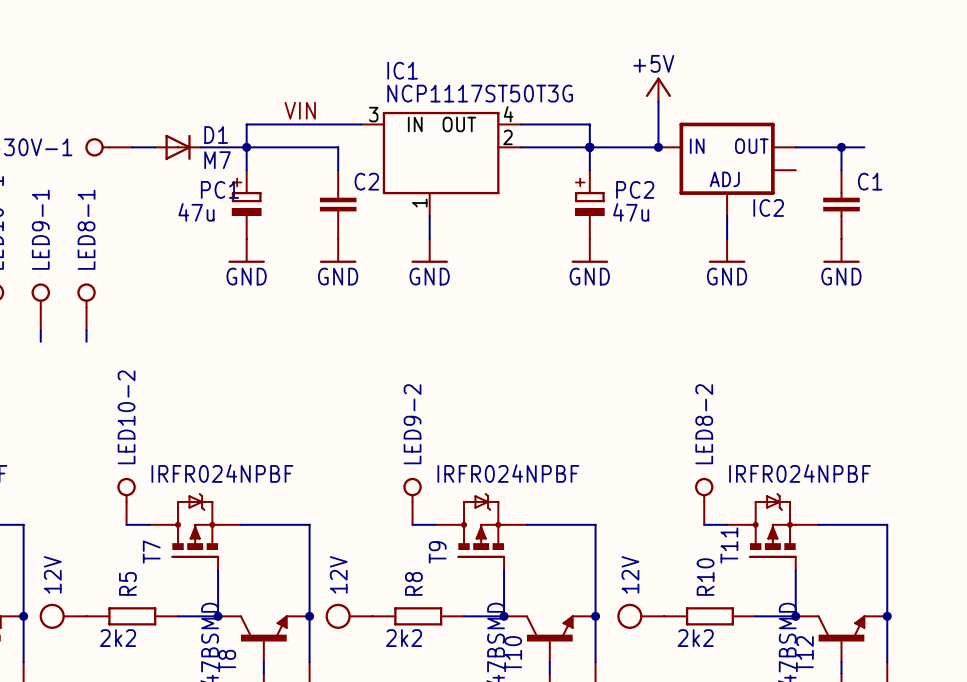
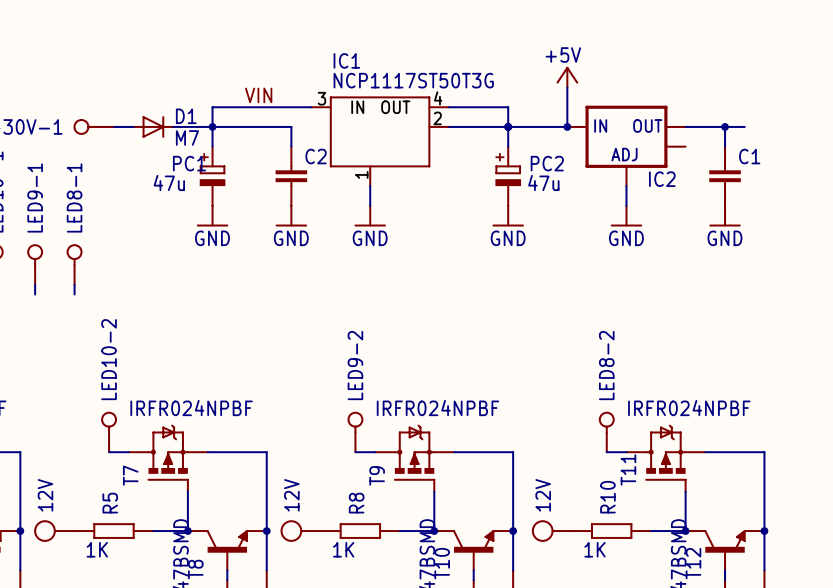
R5 value: 2k2 (118, 638) -> 1K (97, 549)
R8 value: 2k2 (404, 638) -> 1K (343, 549)
R10 value: 2k2 (695, 638) -> 1K (594, 549)

